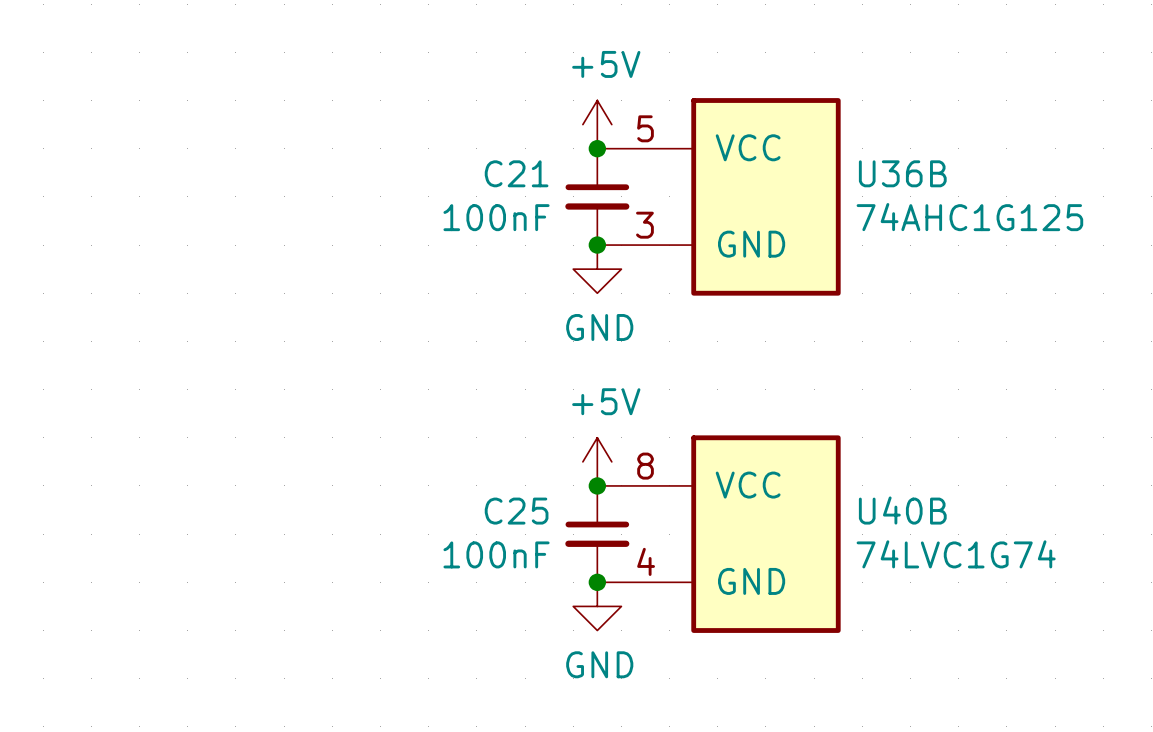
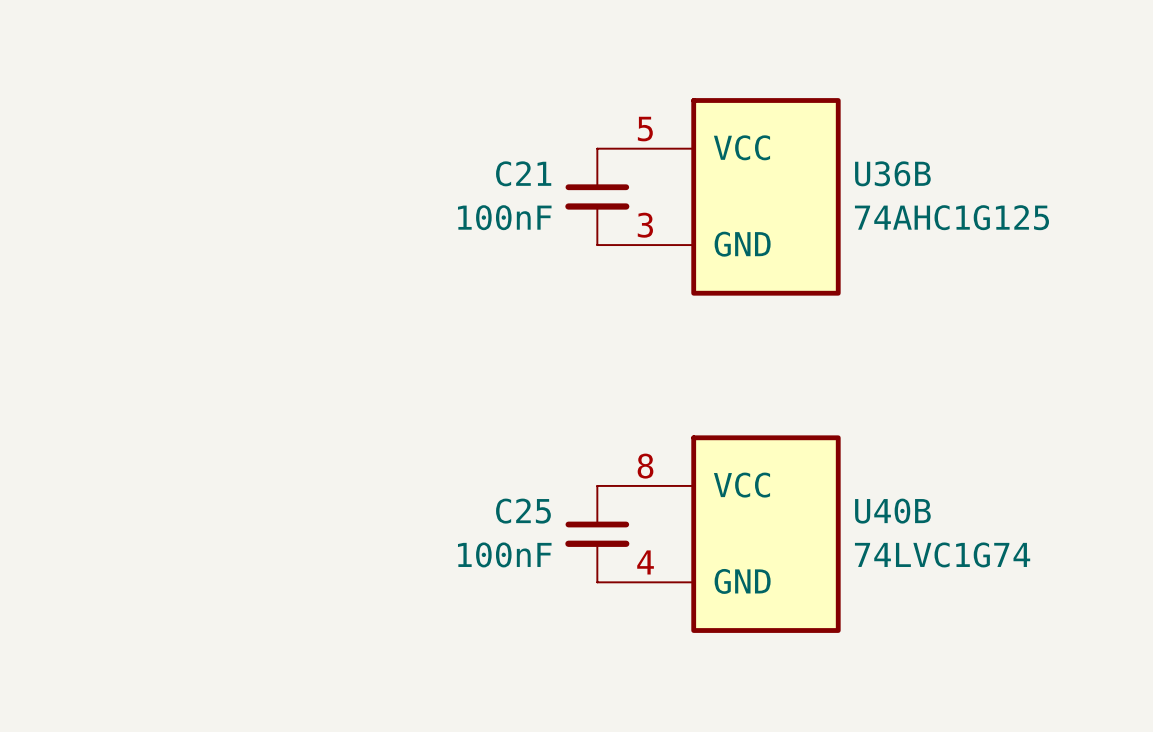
power symbol: +5V (597, 124) -> none
junction: (597, 148) -> none
junction: (597, 245) -> none
power symbol: GND (597, 269) -> none
power symbol: +5V (597, 461) -> none
junction: (597, 485) -> none
junction: (597, 582) -> none
power symbol: GND (597, 606) -> none

